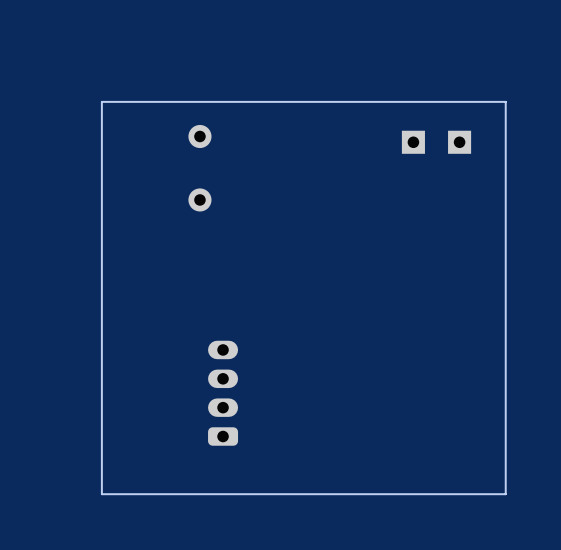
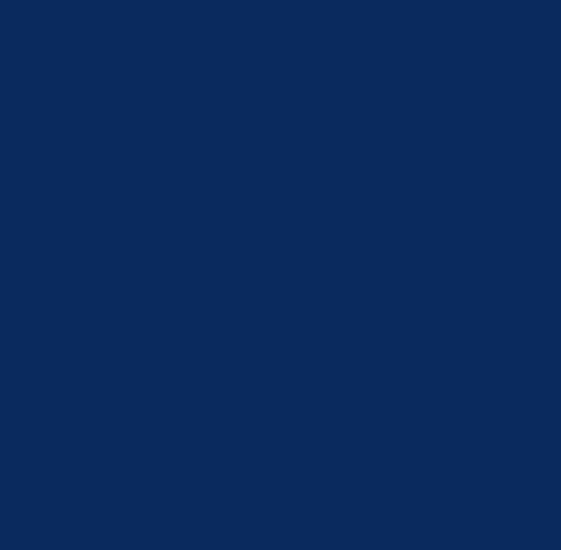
board edge: (505, 101) (101, 101) (101, 494) (505, 494) (505, 101) -> none
part: (199, 136) -> none
part: (413, 142) -> none
part: (459, 142) -> none
part: (199, 199) -> none
part: (223, 393) -> none

